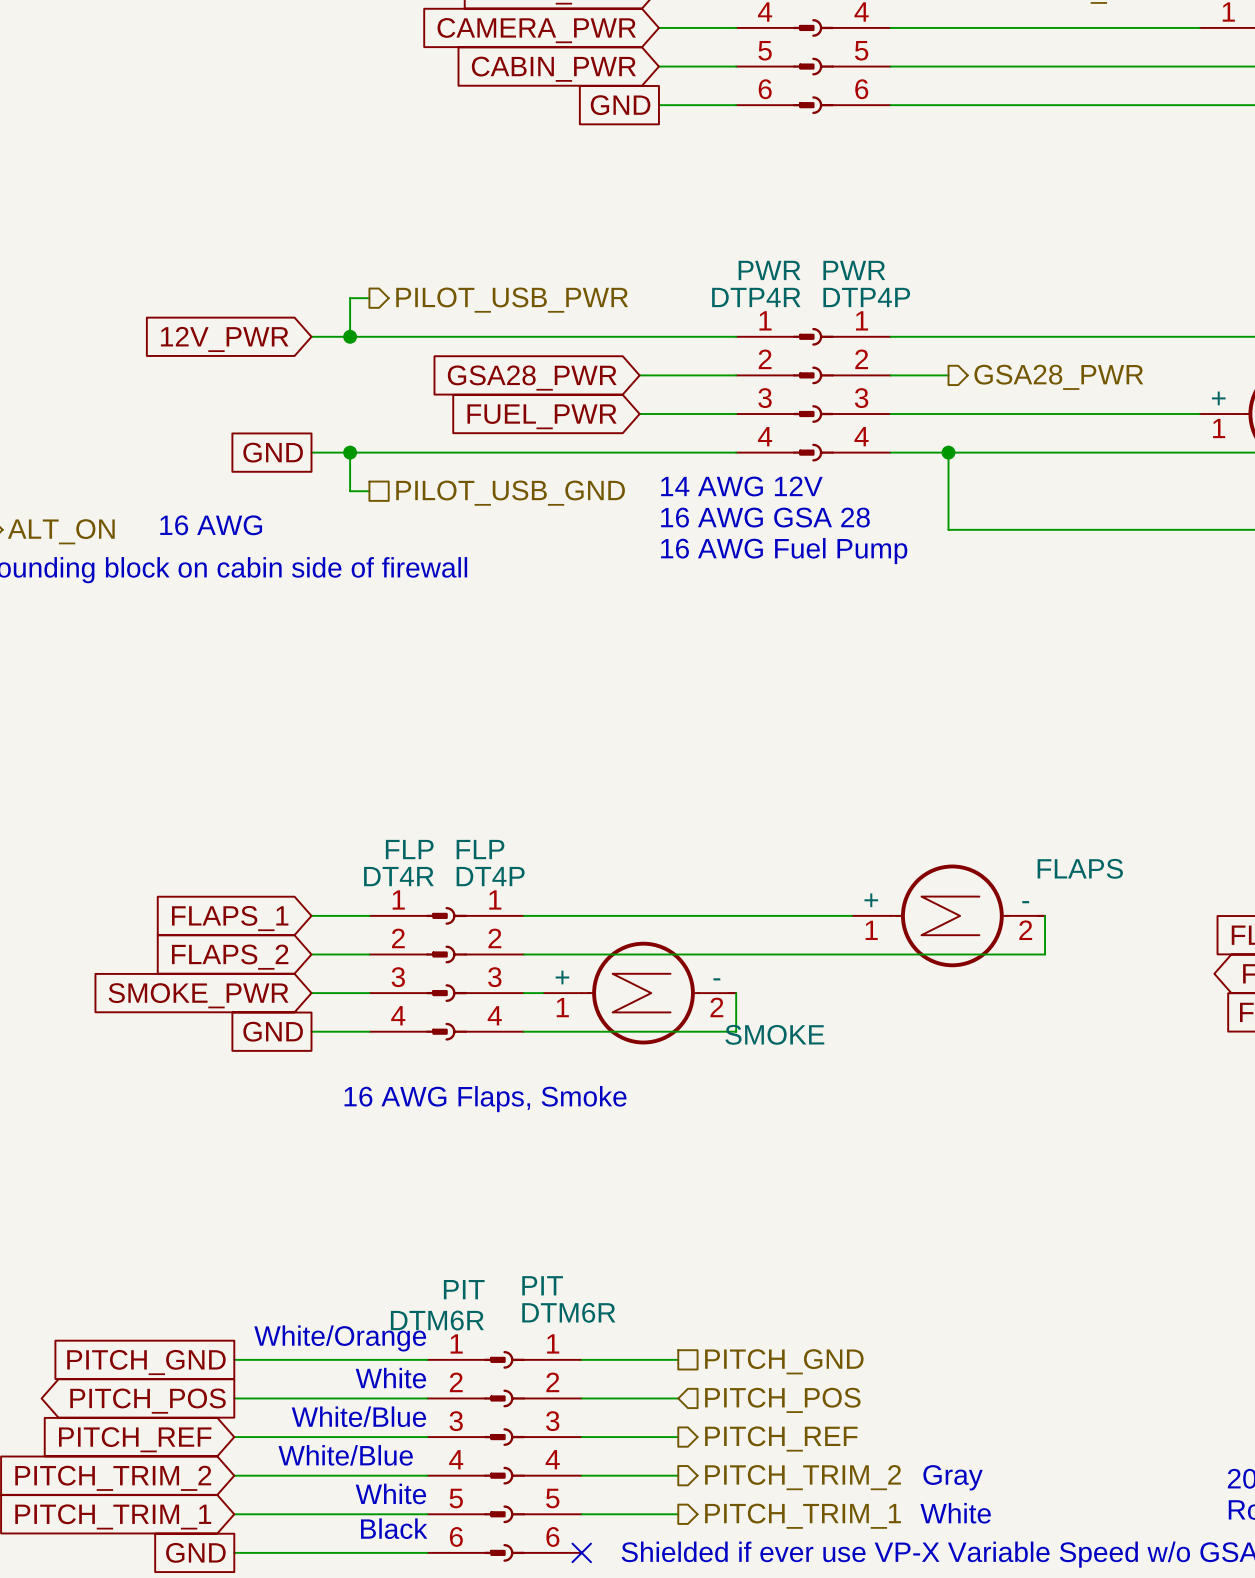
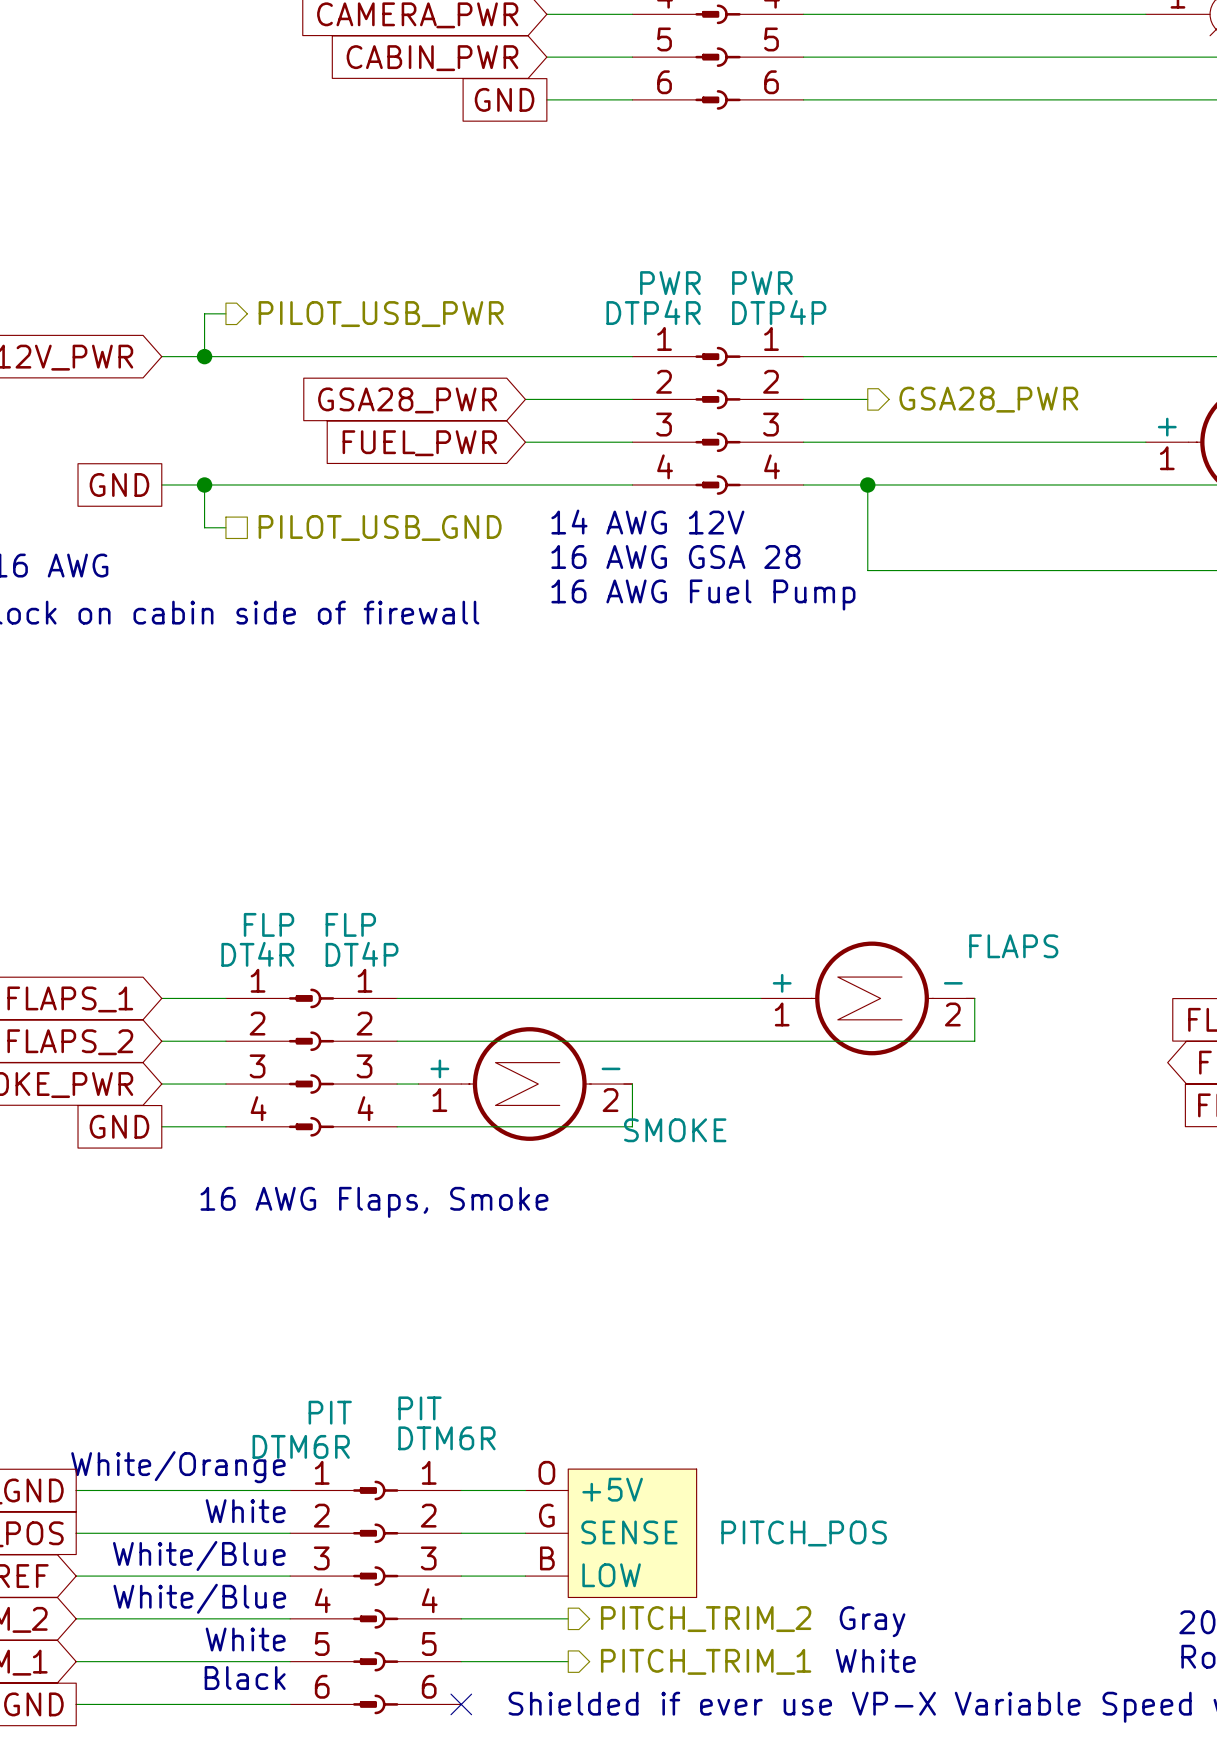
hierarchical label: PITCH_GND (784, 1361) -> none
PITCH_POS: none -> (611, 1533)
hierarchical label: PITCH_POS (782, 1400) -> none
hierarchical label: PITCH_REF (781, 1438) -> none

